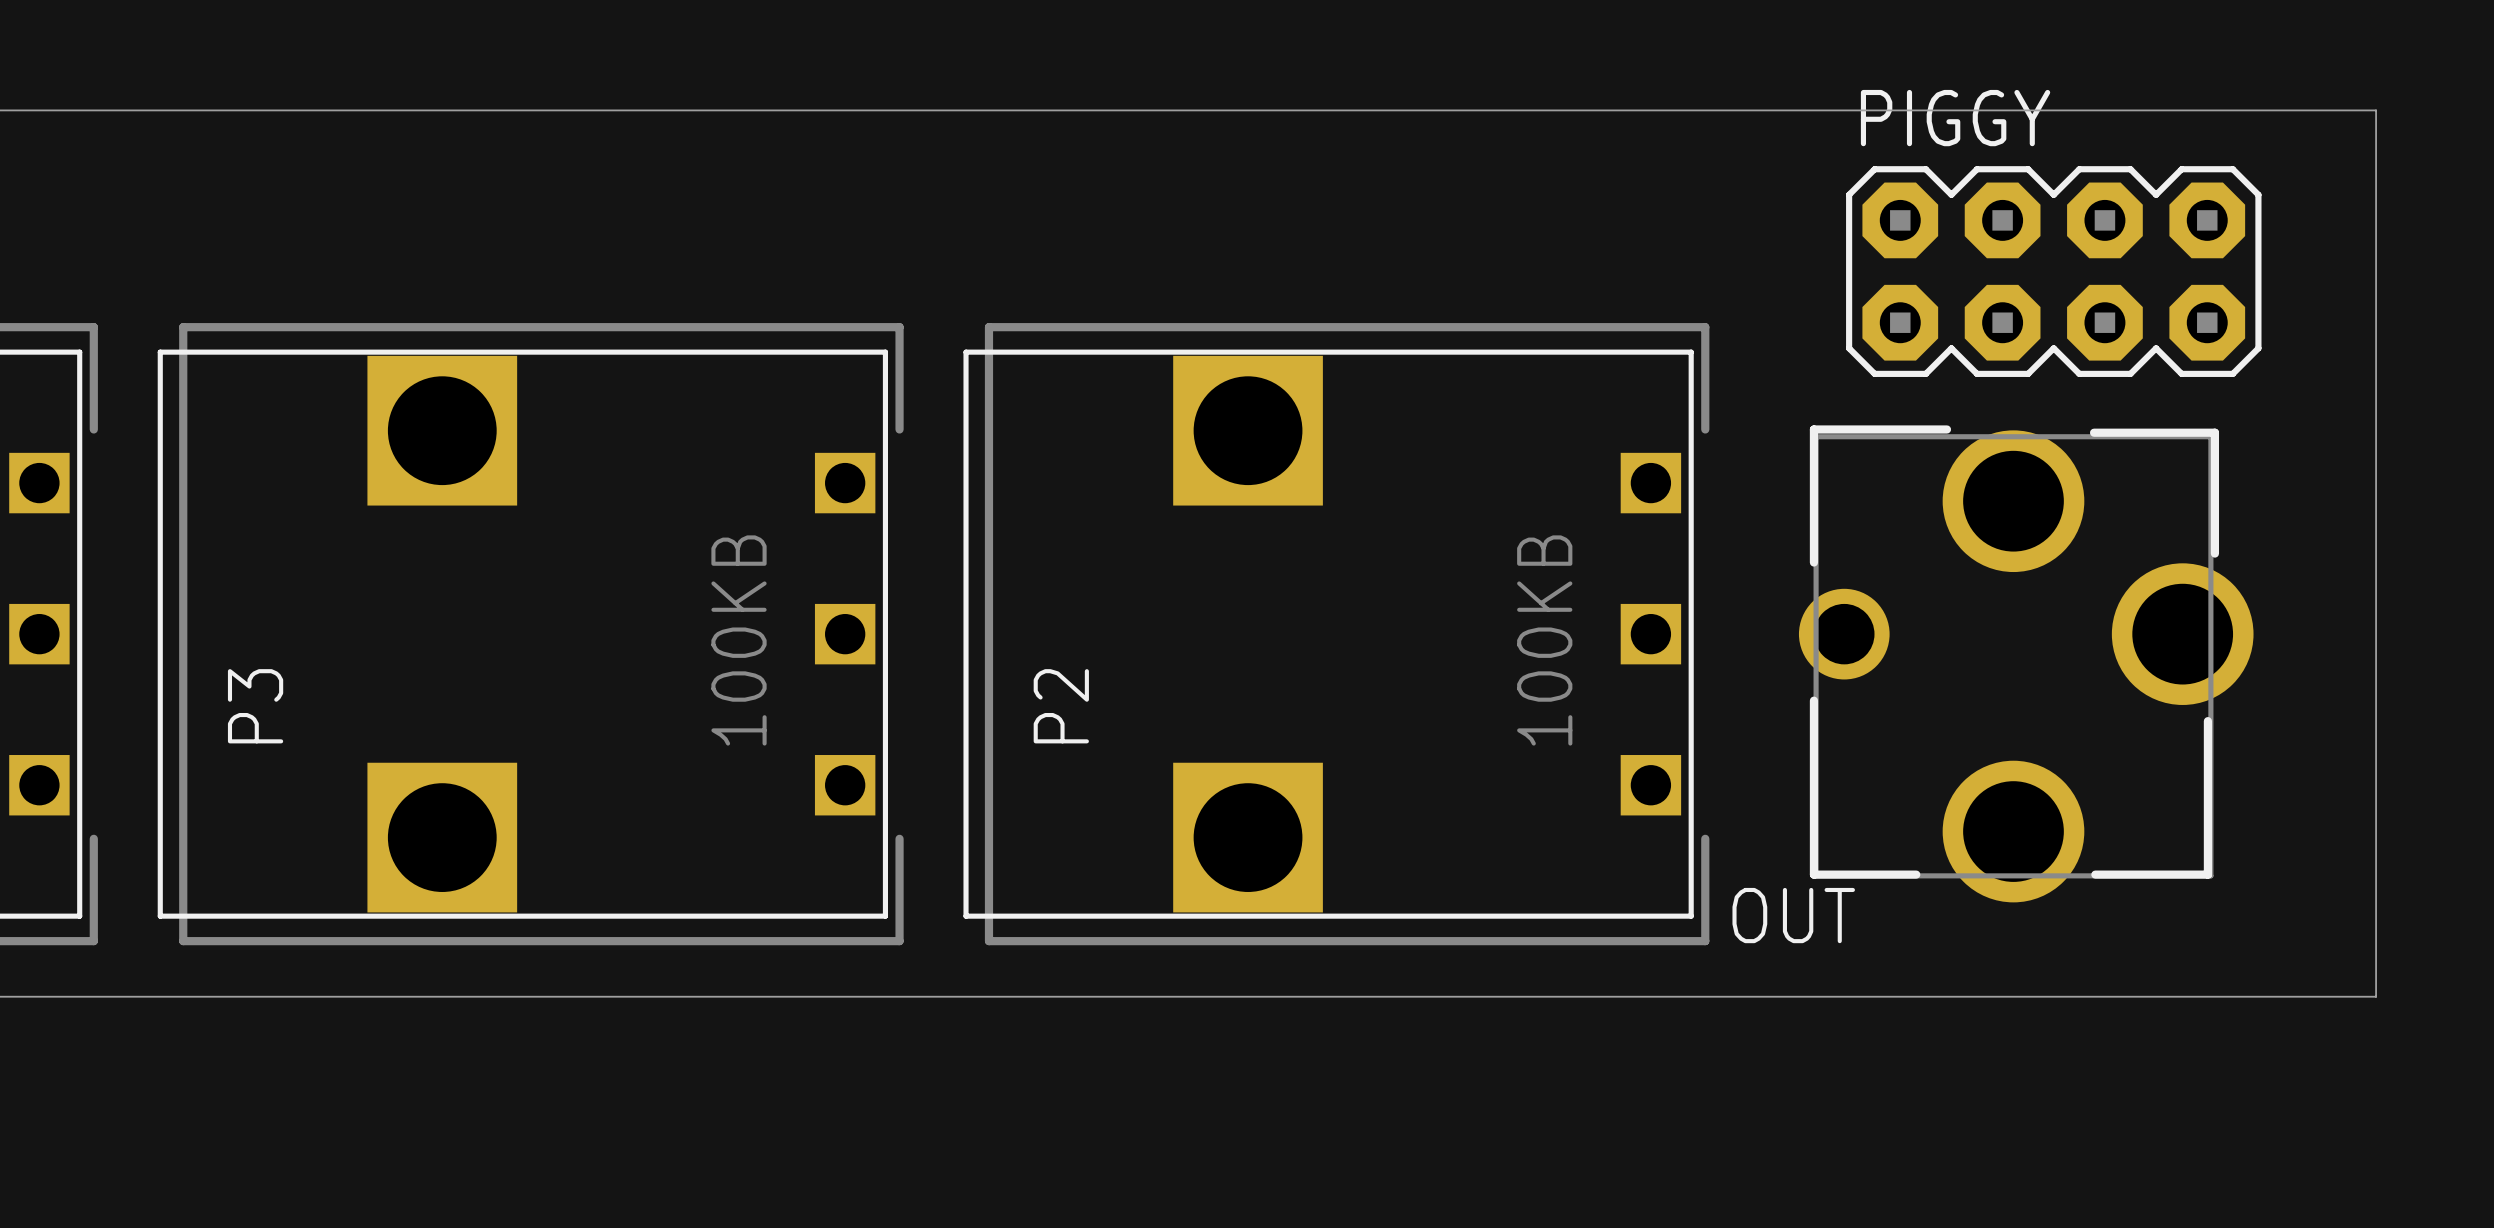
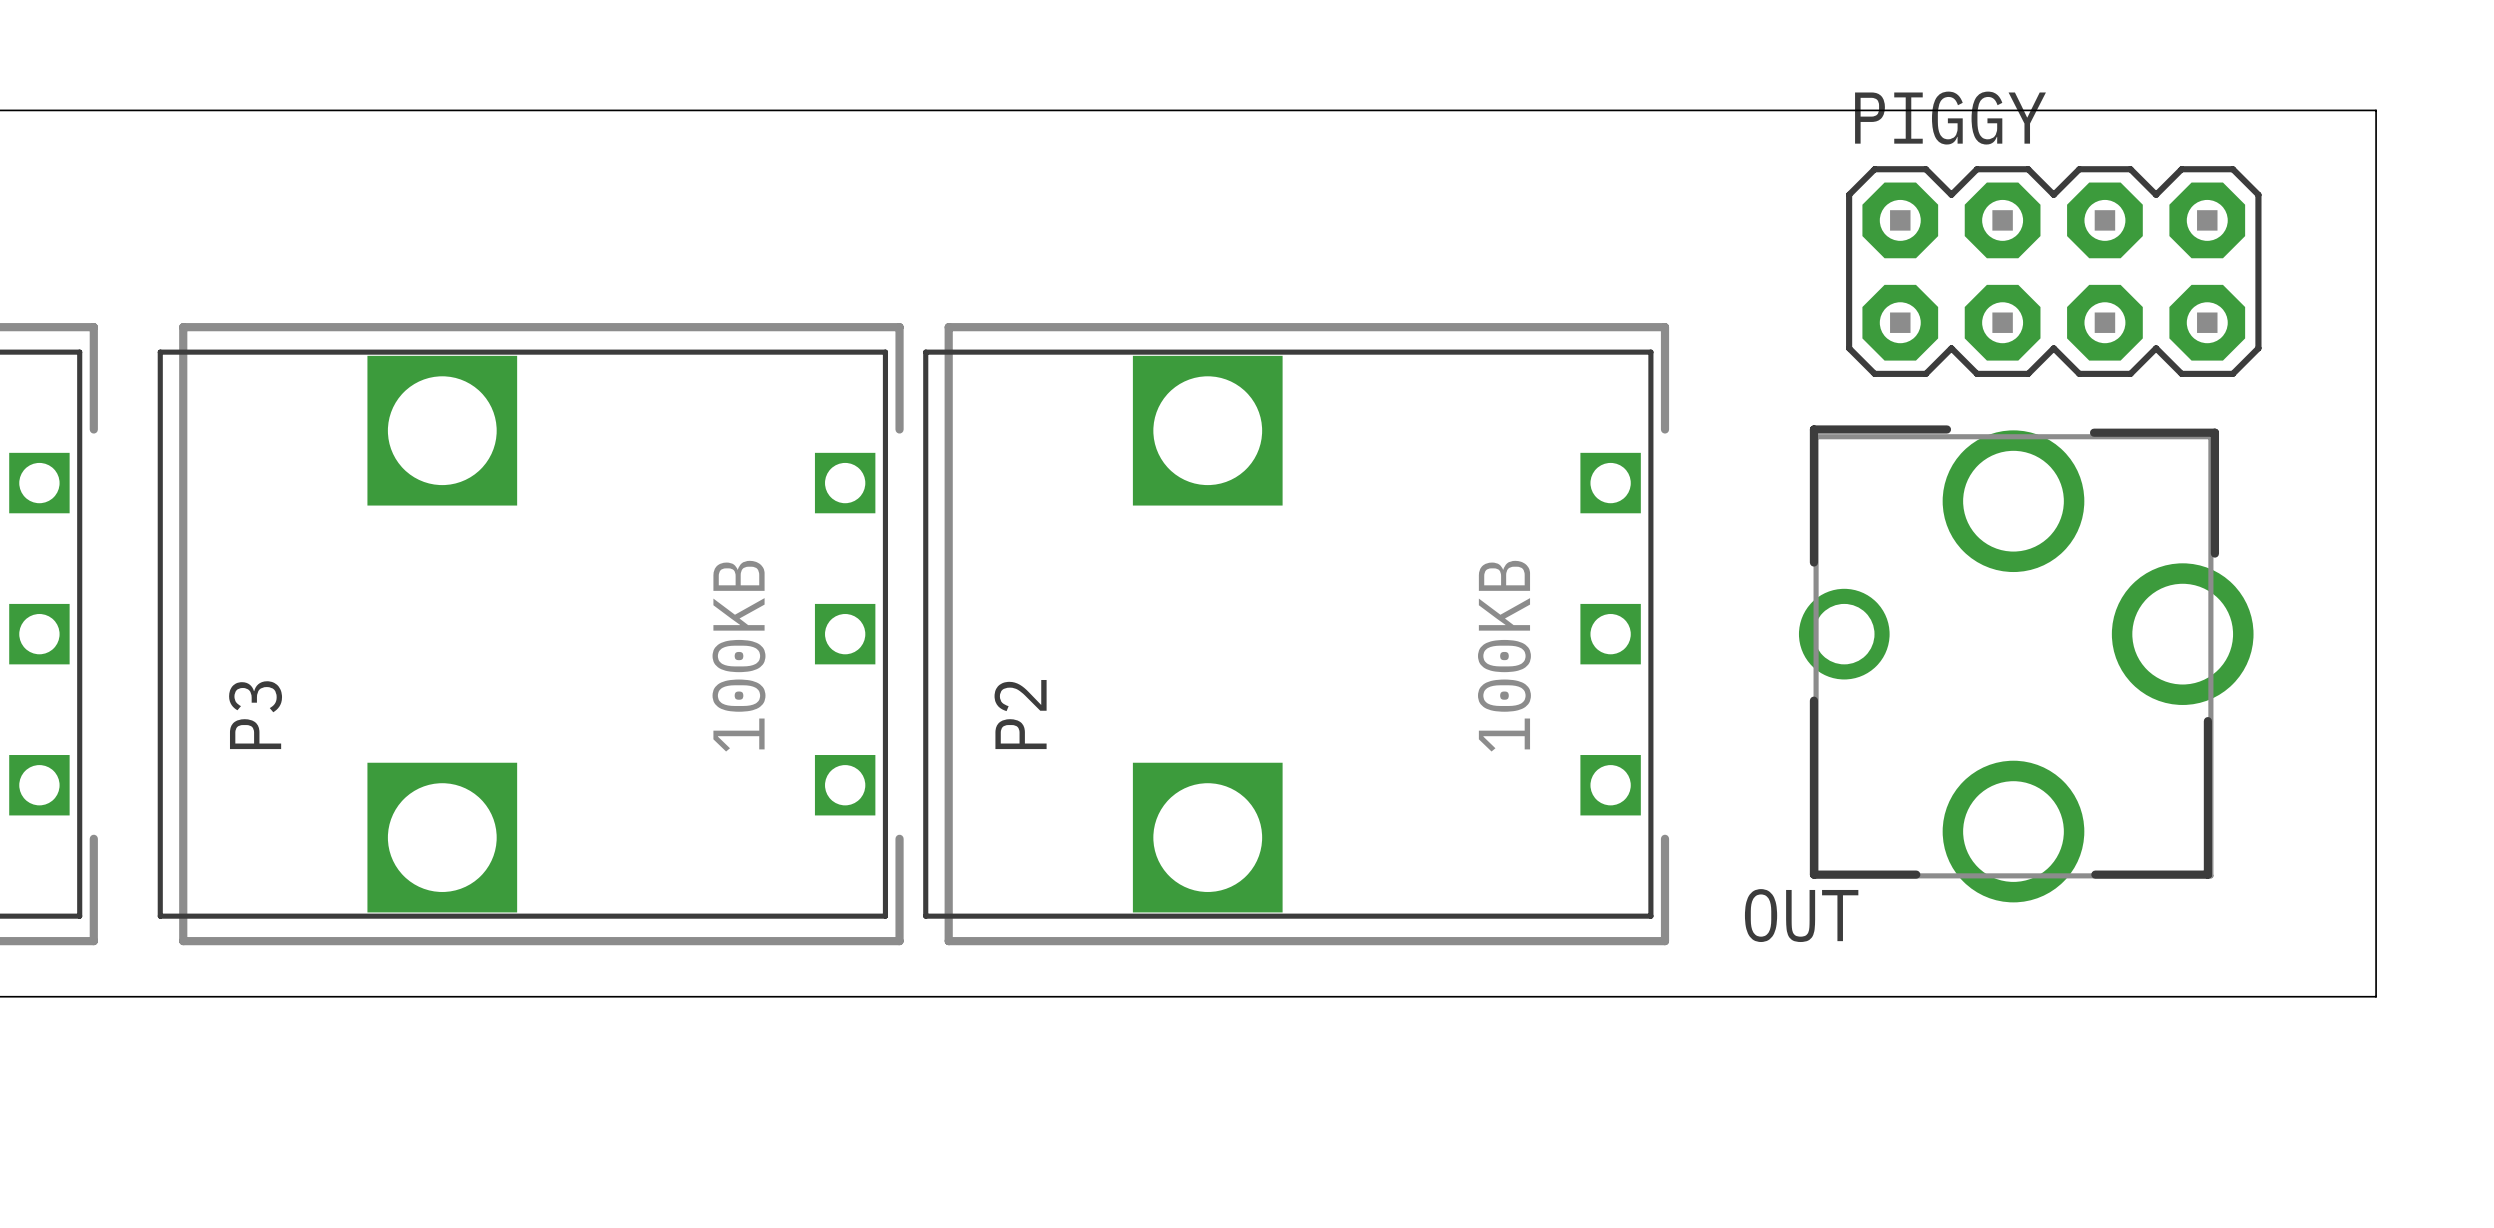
P2 position: (1336, 634) -> (1296, 634)

